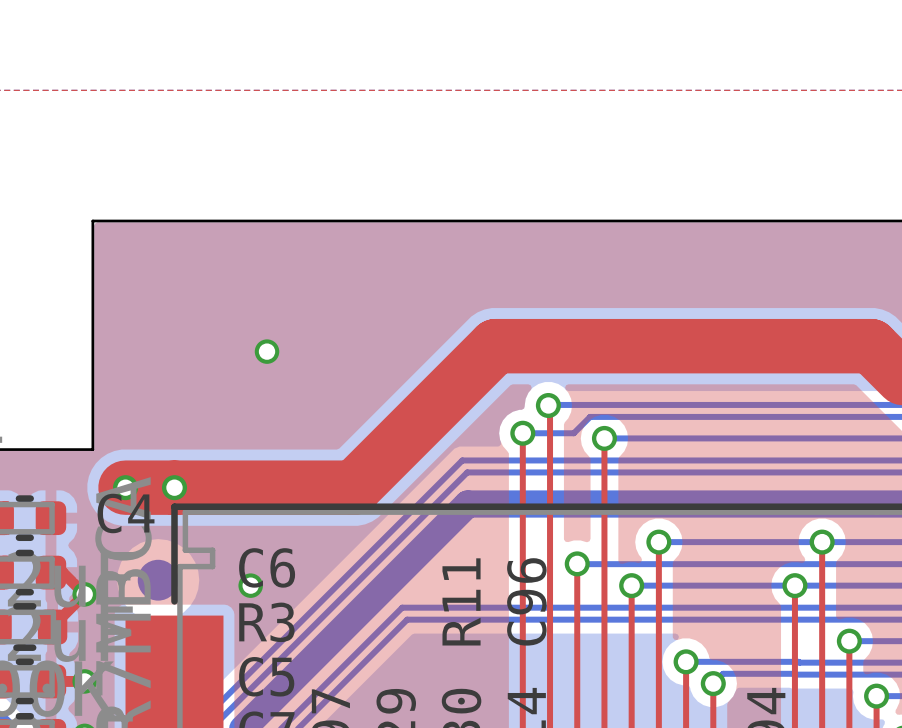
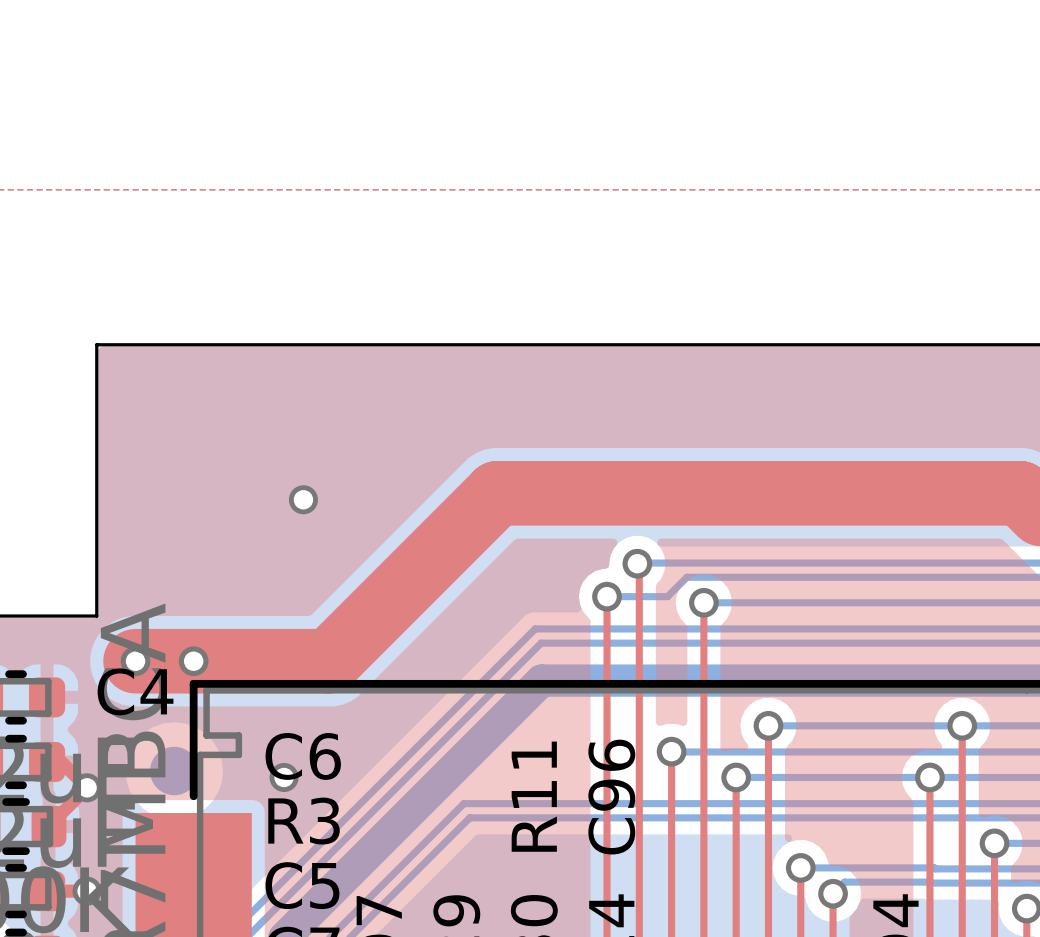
top track: (495, 346) (354, 487) (288, 487) -> (574, 493) (497, 493) (329, 661)

